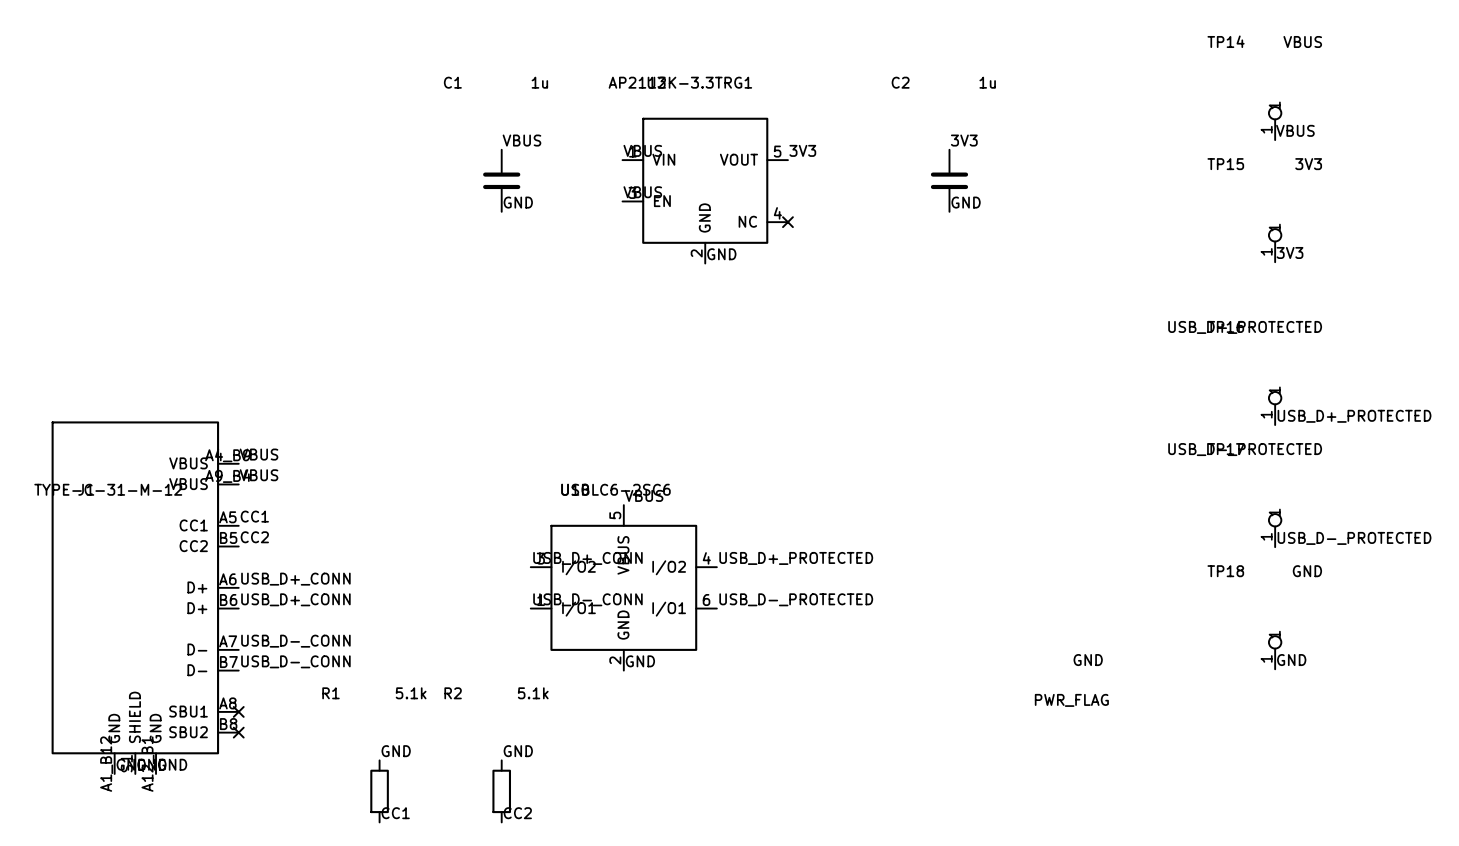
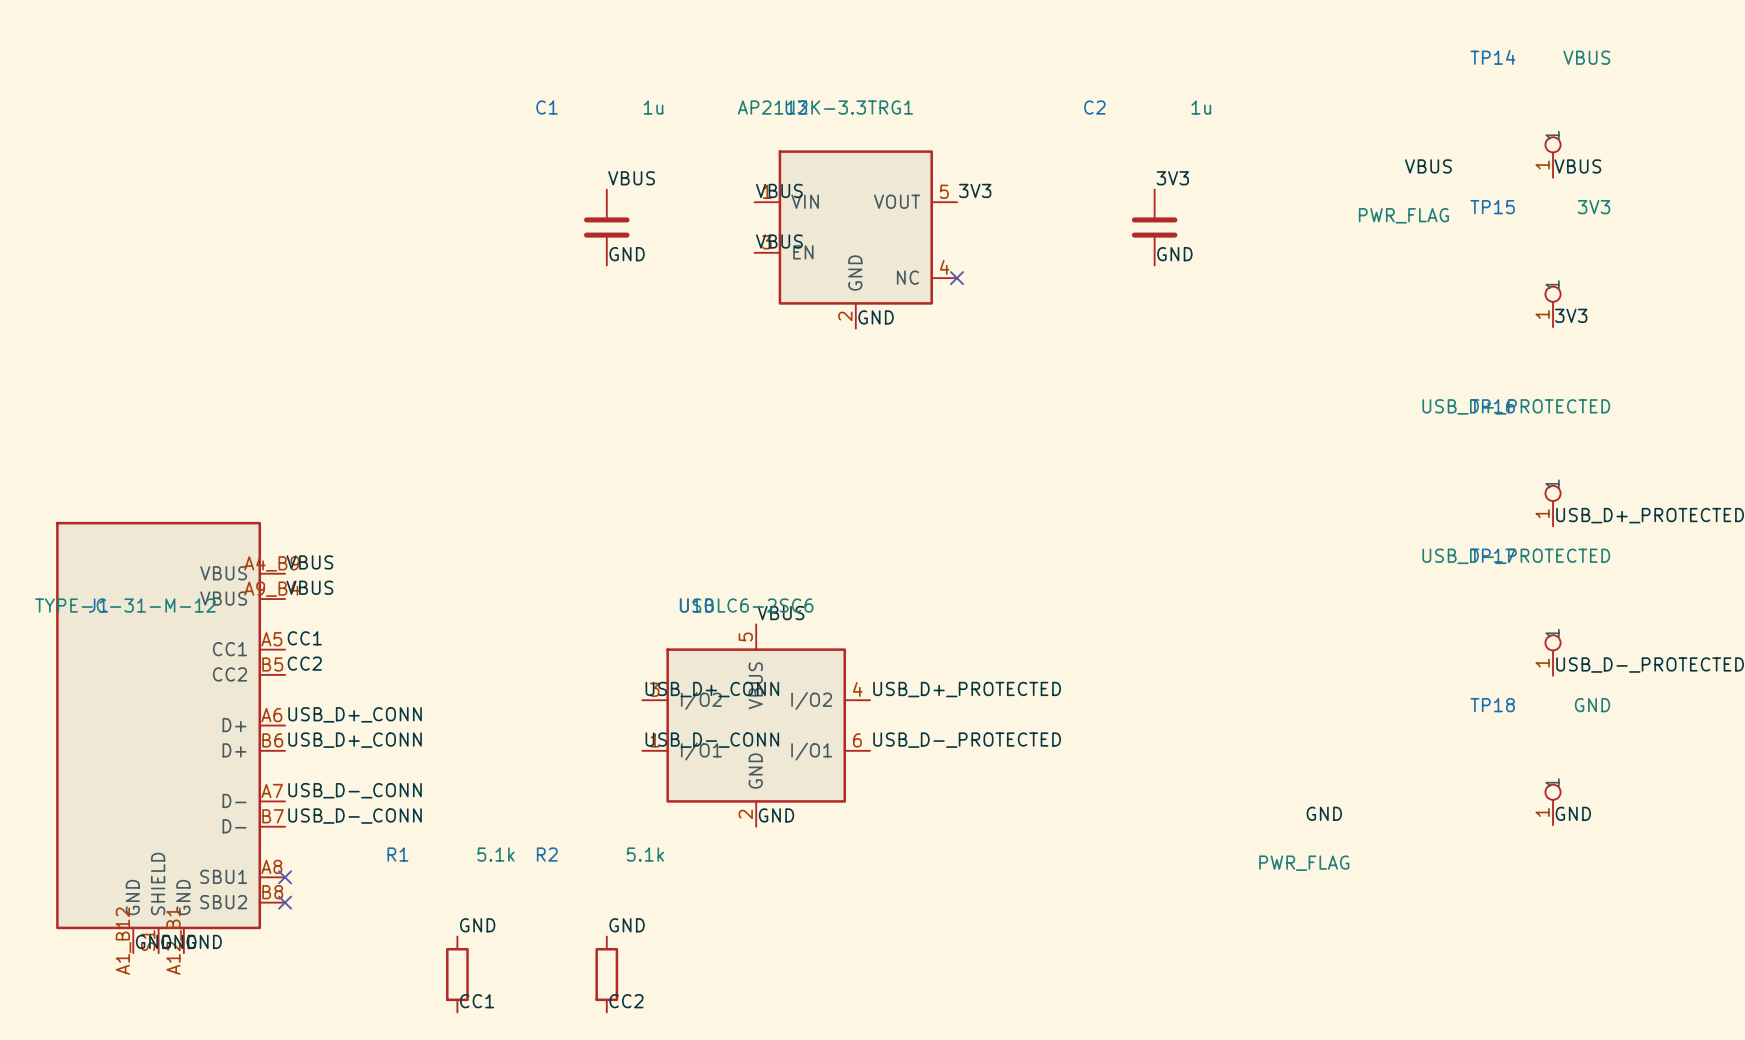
label: none -> VBUS (1428, 166)
power symbol: none -> PWR_FLAG (1403, 215)

